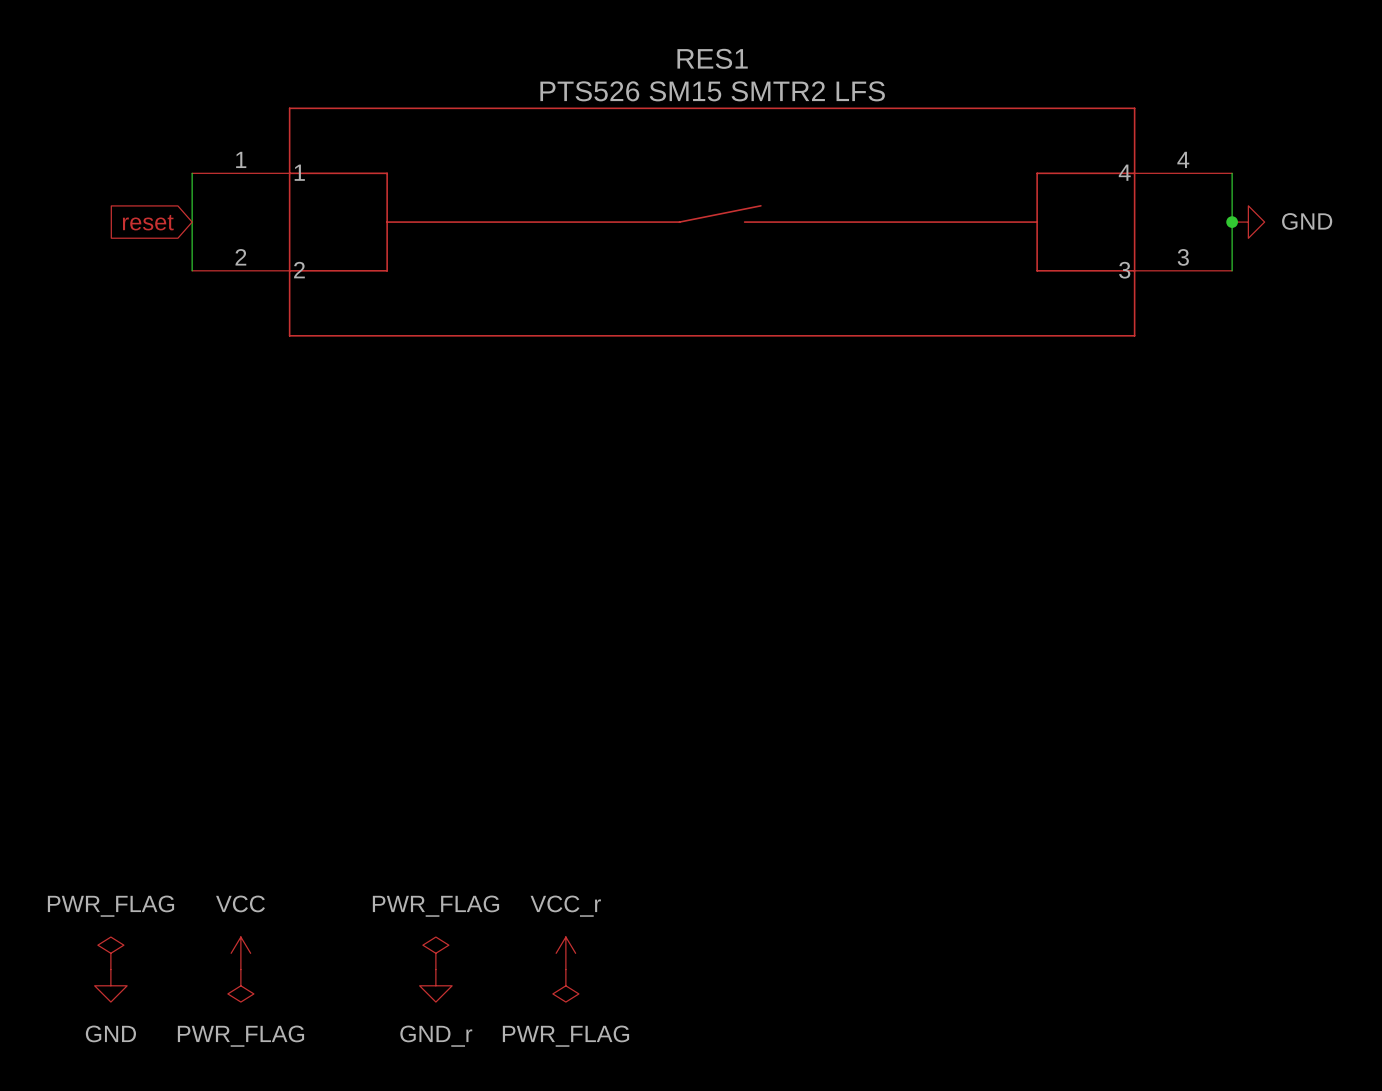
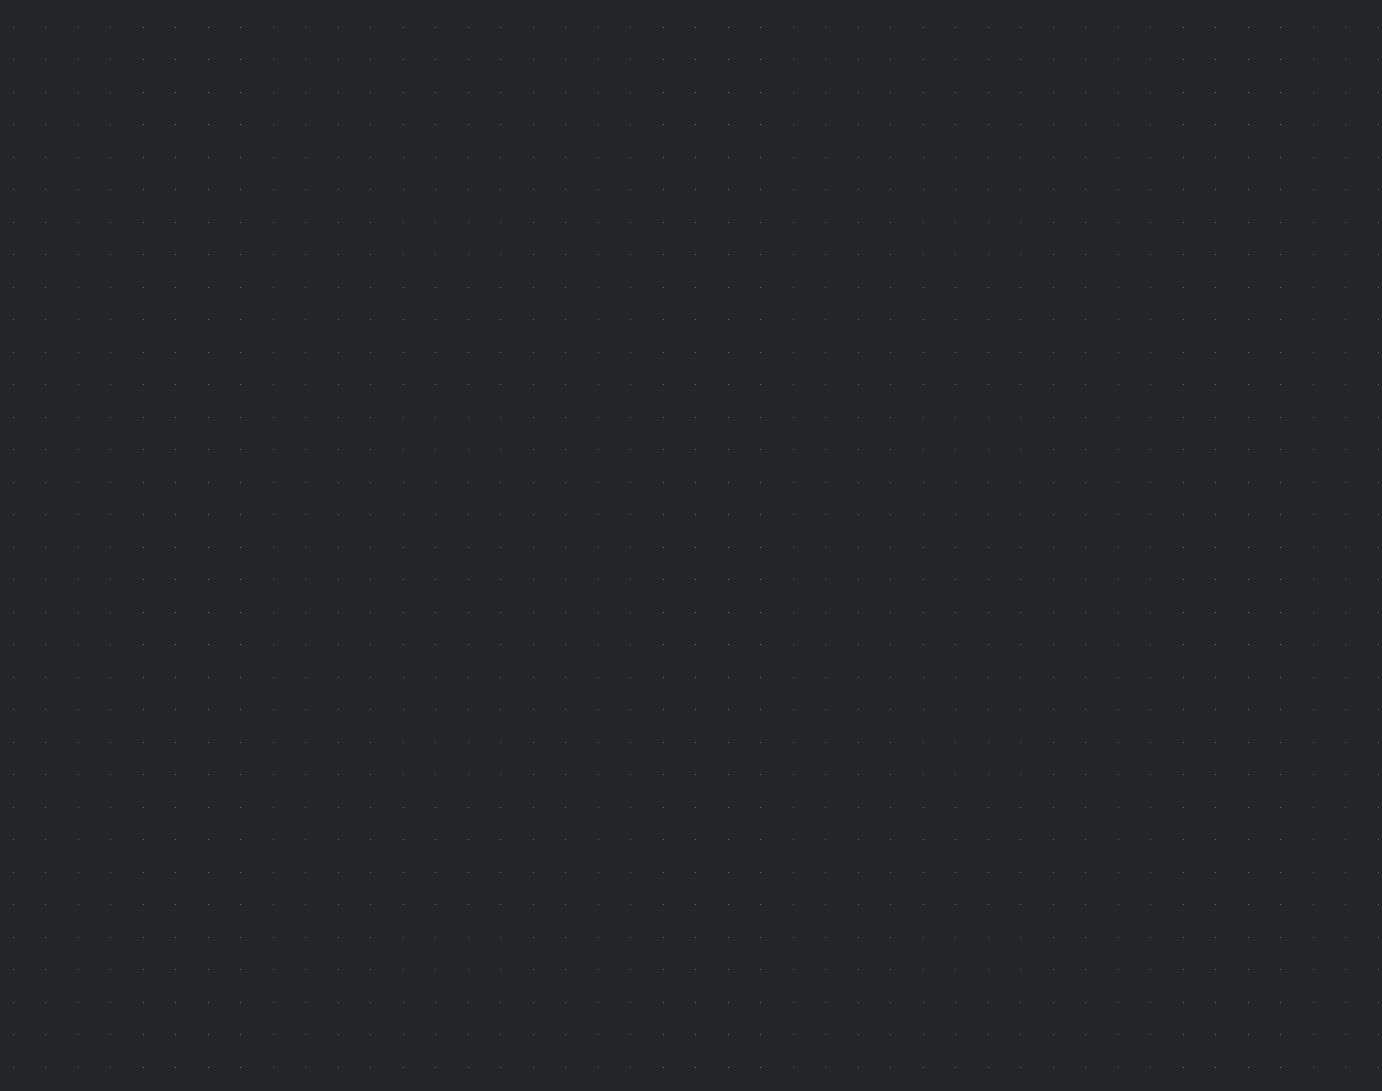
wire: (192, 173) (192, 270) -> none
wire: (1232, 173) (1232, 270) -> none
global label: reset (148, 222) -> none
RES1: PTS526 SM15 SMTR2 LFS (712, 222) -> none
junction: (1232, 222) -> none
power symbol: GND (1248, 222) -> none
power symbol: PWR_FLAG (110, 953) -> none
power symbol: VCC (240, 953) -> none
power symbol: PWR_FLAG (435, 953) -> none
power symbol: VCC_r (565, 953) -> none
power symbol: GND (110, 985) -> none
power symbol: PWR_FLAG (240, 985) -> none
power symbol: GND_r (435, 985) -> none
power symbol: PWR_FLAG (565, 985) -> none

